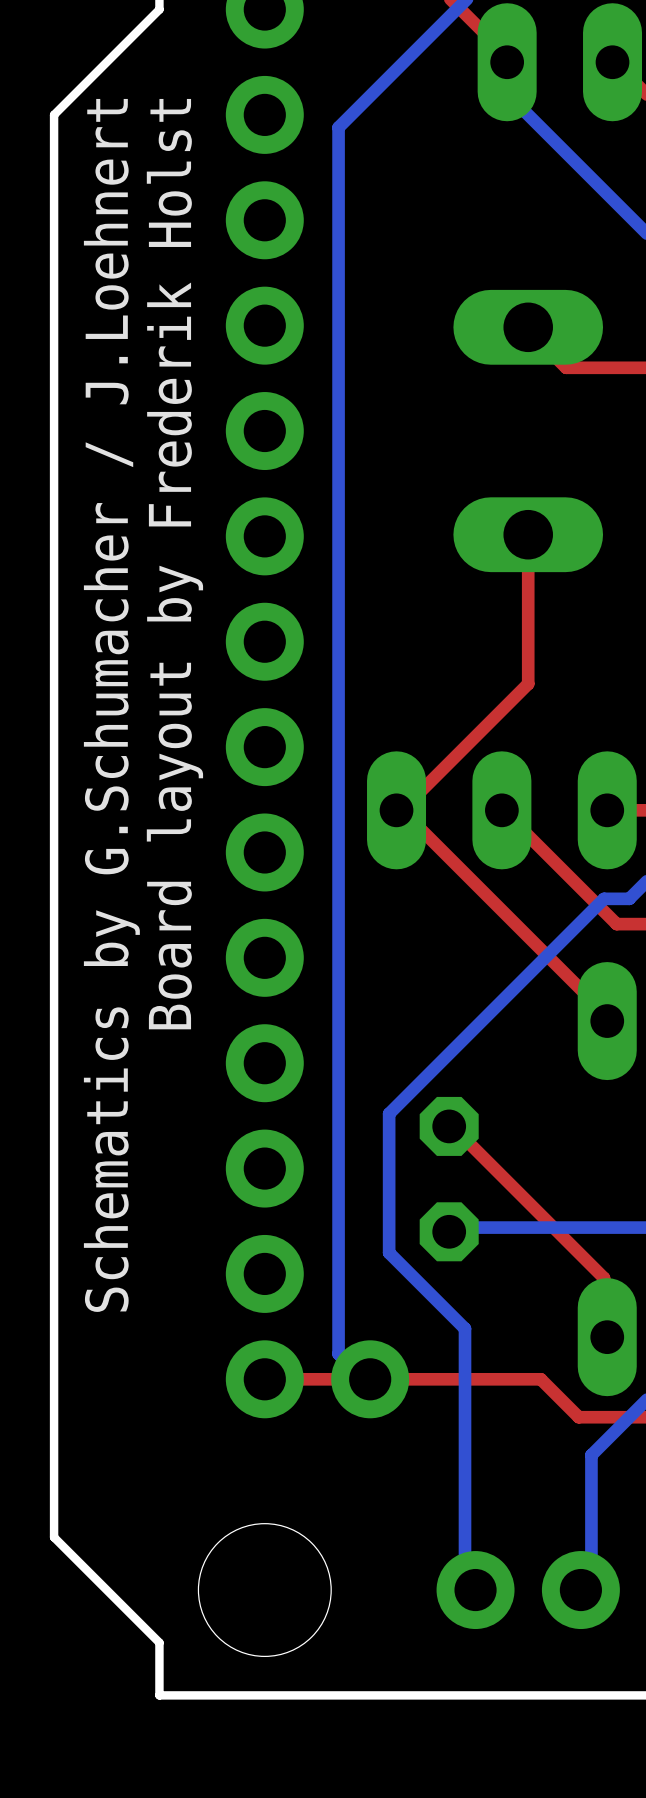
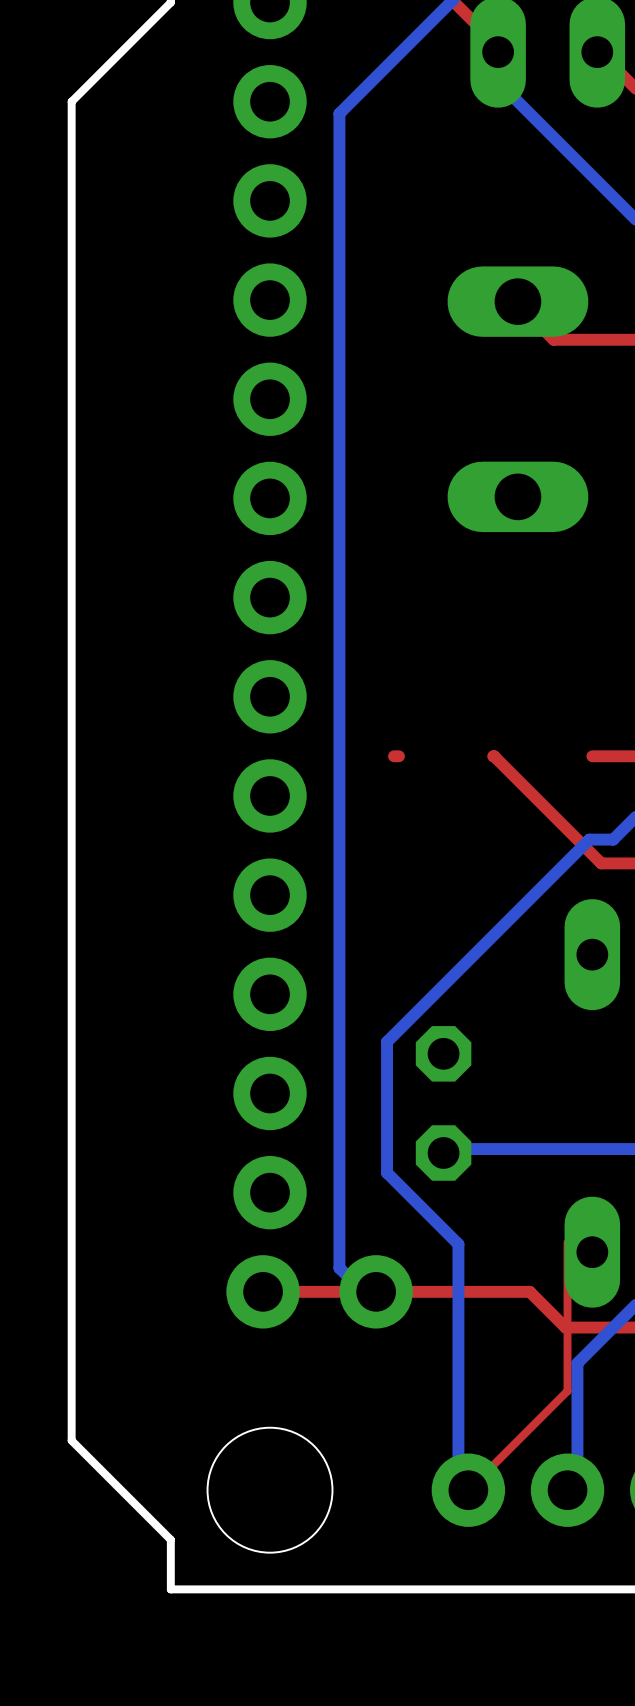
top track: (528, 534) (528, 683) (401, 810) (604, 1012) (607, 1021) -> none
text: Board layout by Frederik Holst (174, 564) -> none
text: Schematics by G.Schumacher / J.Loehnert (111, 705) -> none
part: (501, 810) -> none
top track: (449, 1126) (452, 1126) (604, 1278) (604, 1328) (607, 1337) -> none
top track: none -> (567, 1242) (567, 1391) (468, 1490)
part footprint: [225, 1340, 410, 1419] -> [226, 1255, 413, 1329]

